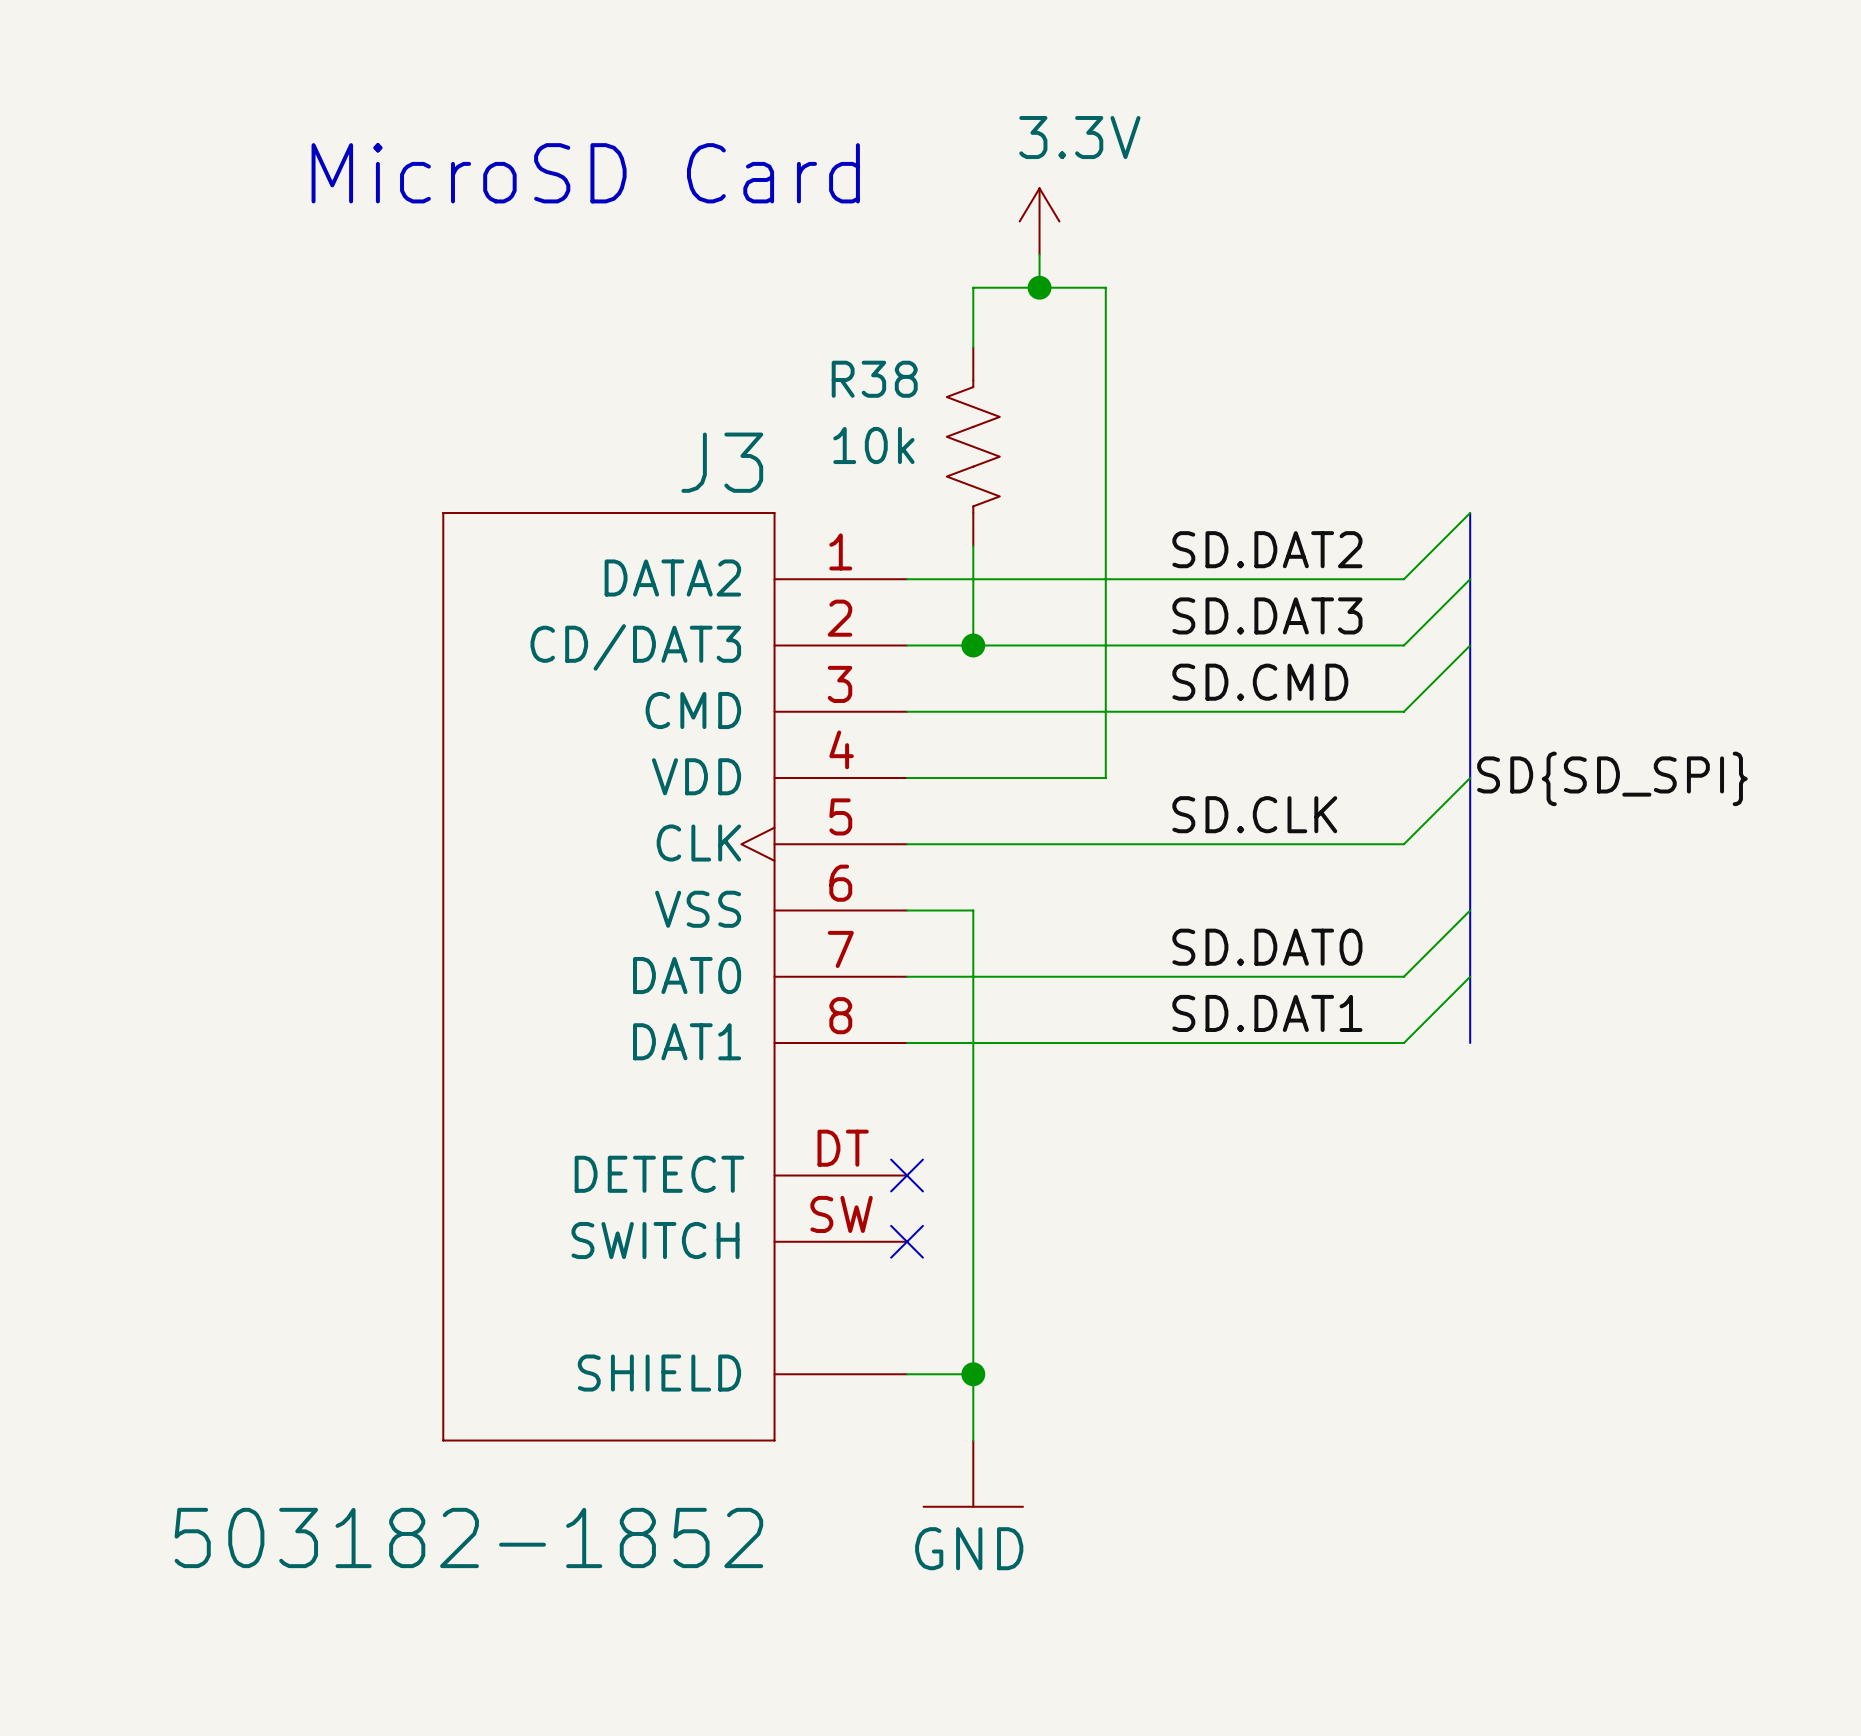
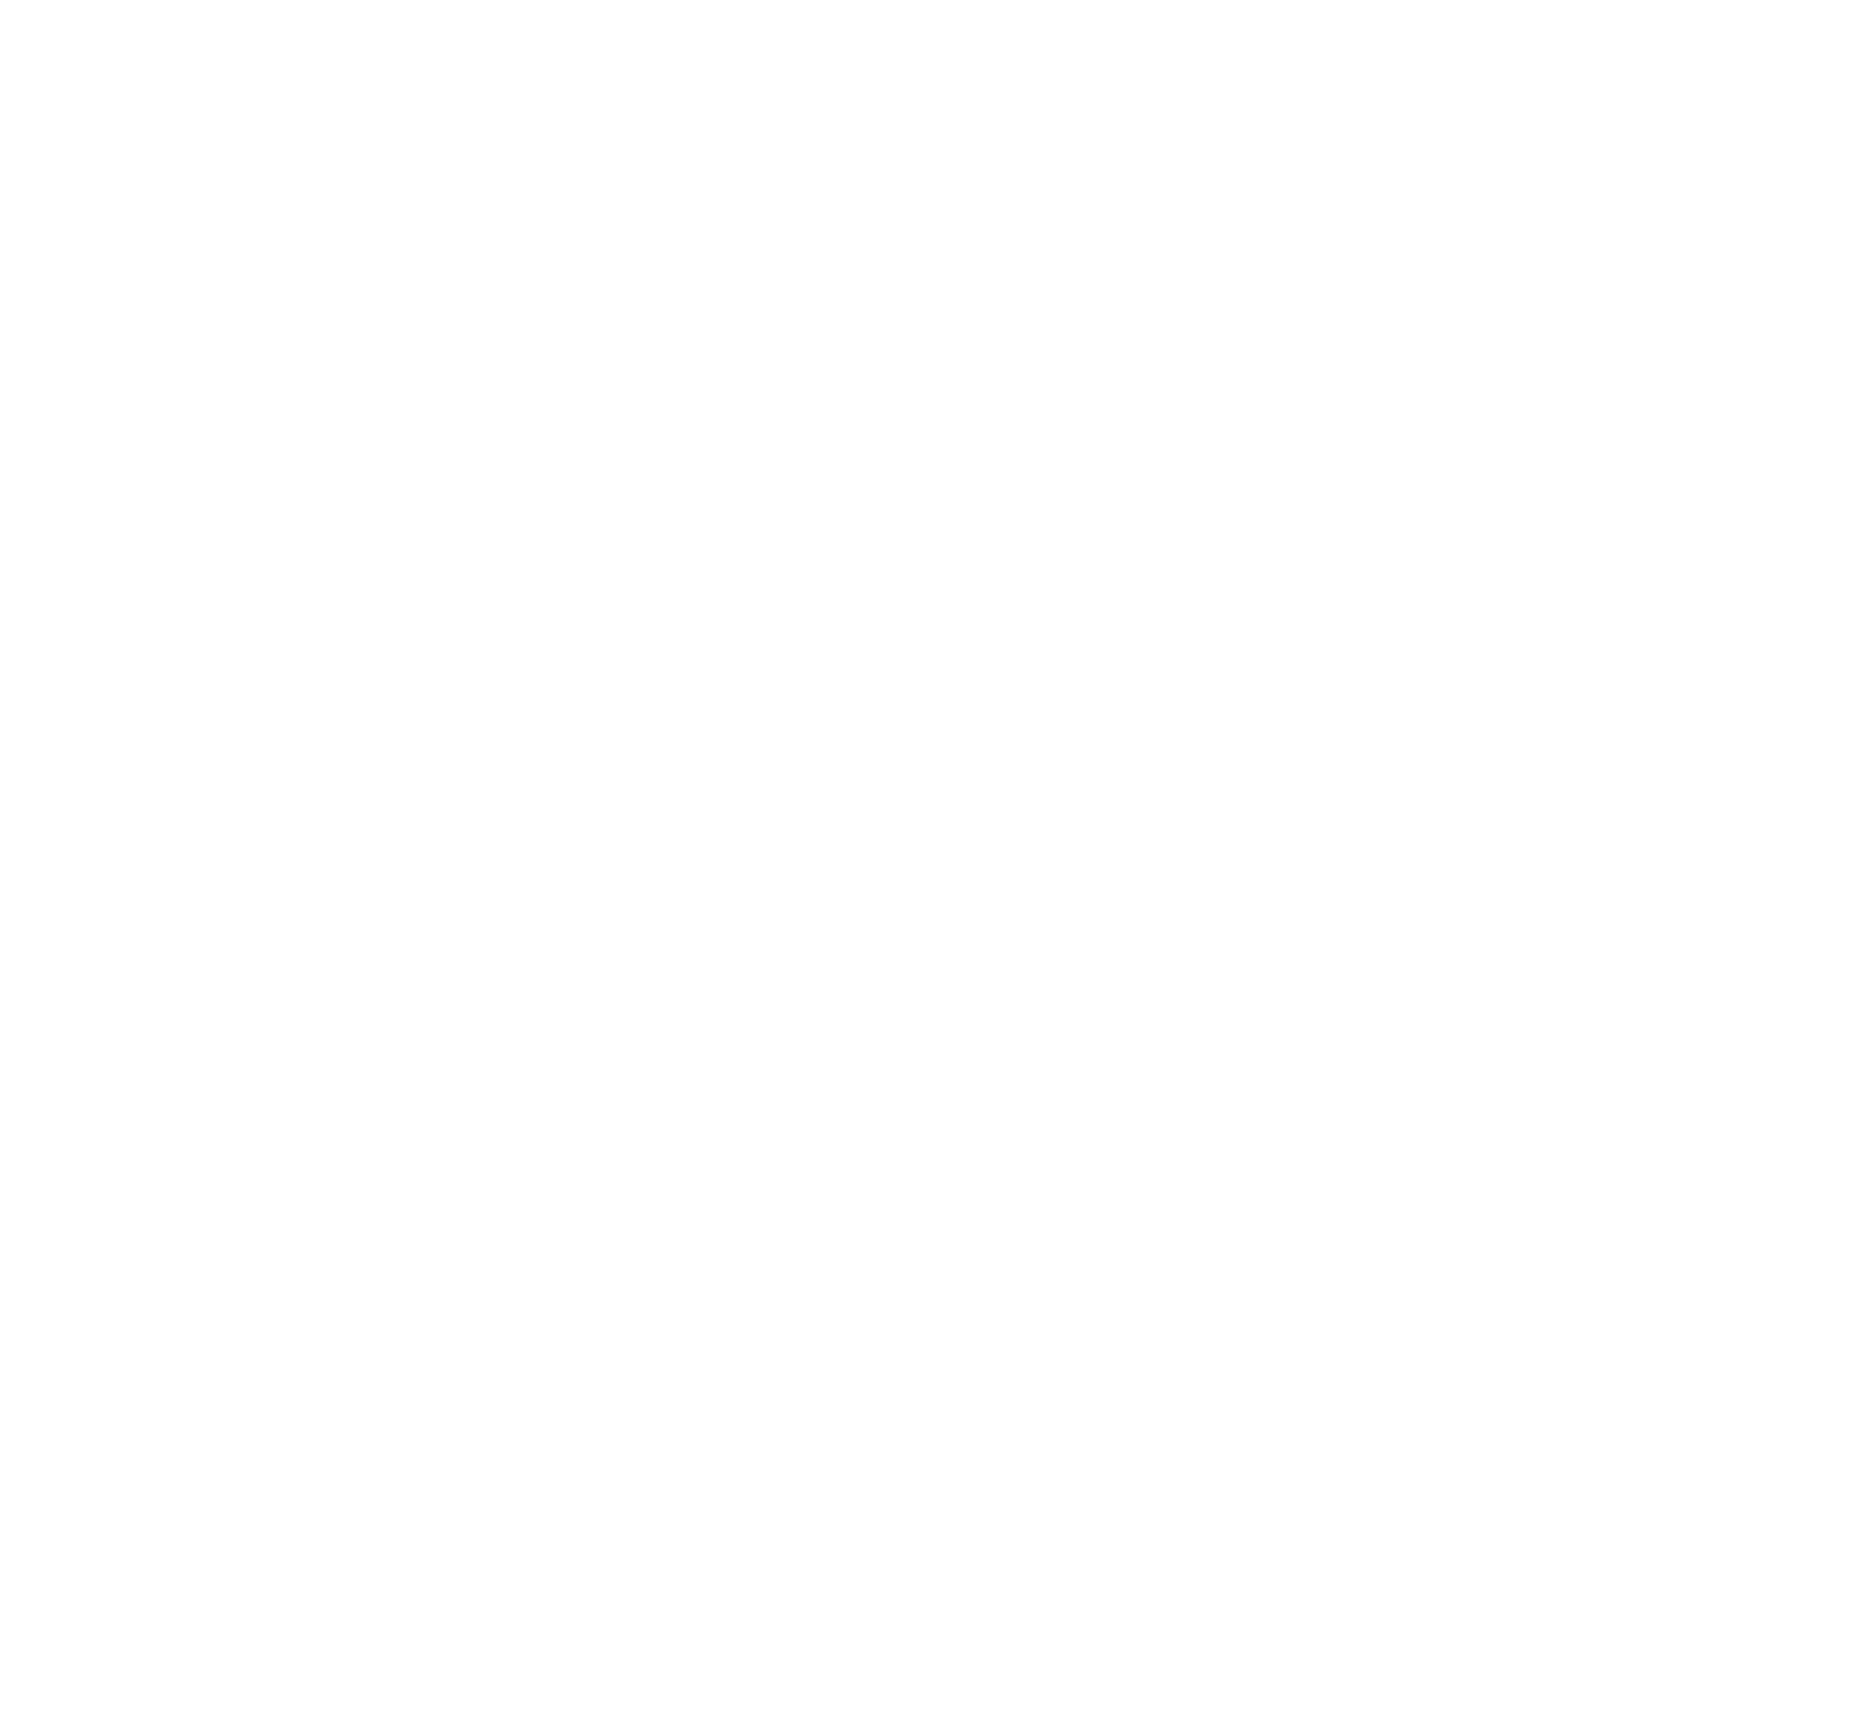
text: MicroSD Card (585, 173) -> none
power symbol: 3.3V (1039, 221) -> none
wire: (1039, 254) (1039, 287) -> none
junction: (1039, 287) -> none
wire: (973, 347) (973, 287) (1105, 287) (1105, 778) (907, 778) -> none
R38: 10k (973, 446) -> none
wire: (1470, 512) (1403, 579) (907, 579) -> none
bus: (1470, 512) (1470, 1043) -> none
wire: (973, 546) (973, 645) -> none
label: SD.DAT2 (1267, 549) -> none
wire: (1470, 579) (1403, 645) (907, 645) -> none
label: SD.DAT3 (1267, 615) -> none
junction: (973, 645) -> none
wire: (1470, 645) (1403, 711) (907, 711) -> none
label: SD.CMD (1260, 682) -> none
wire: (1470, 778) (1403, 844) (907, 844) -> none
label: SD{SD_SPI} (1612, 778) -> none
label: SD.CLK (1254, 814) -> none
wire: (907, 910) (973, 910) (973, 1440) -> none
wire: (1470, 910) (1403, 976) (907, 976) -> none
label: SD.DAT0 (1267, 947) -> none
J3: 503182-1852 (675, 976) -> none
wire: (1470, 976) (1403, 1043) (907, 1043) -> none
label: SD.DAT1 (1267, 1013) -> none
no-connect mark: (907, 1175) -> none
no-connect mark: (907, 1241) -> none
wire: (907, 1374) (973, 1374) -> none
junction: (973, 1374) -> none
power symbol: GND (973, 1473) -> none

